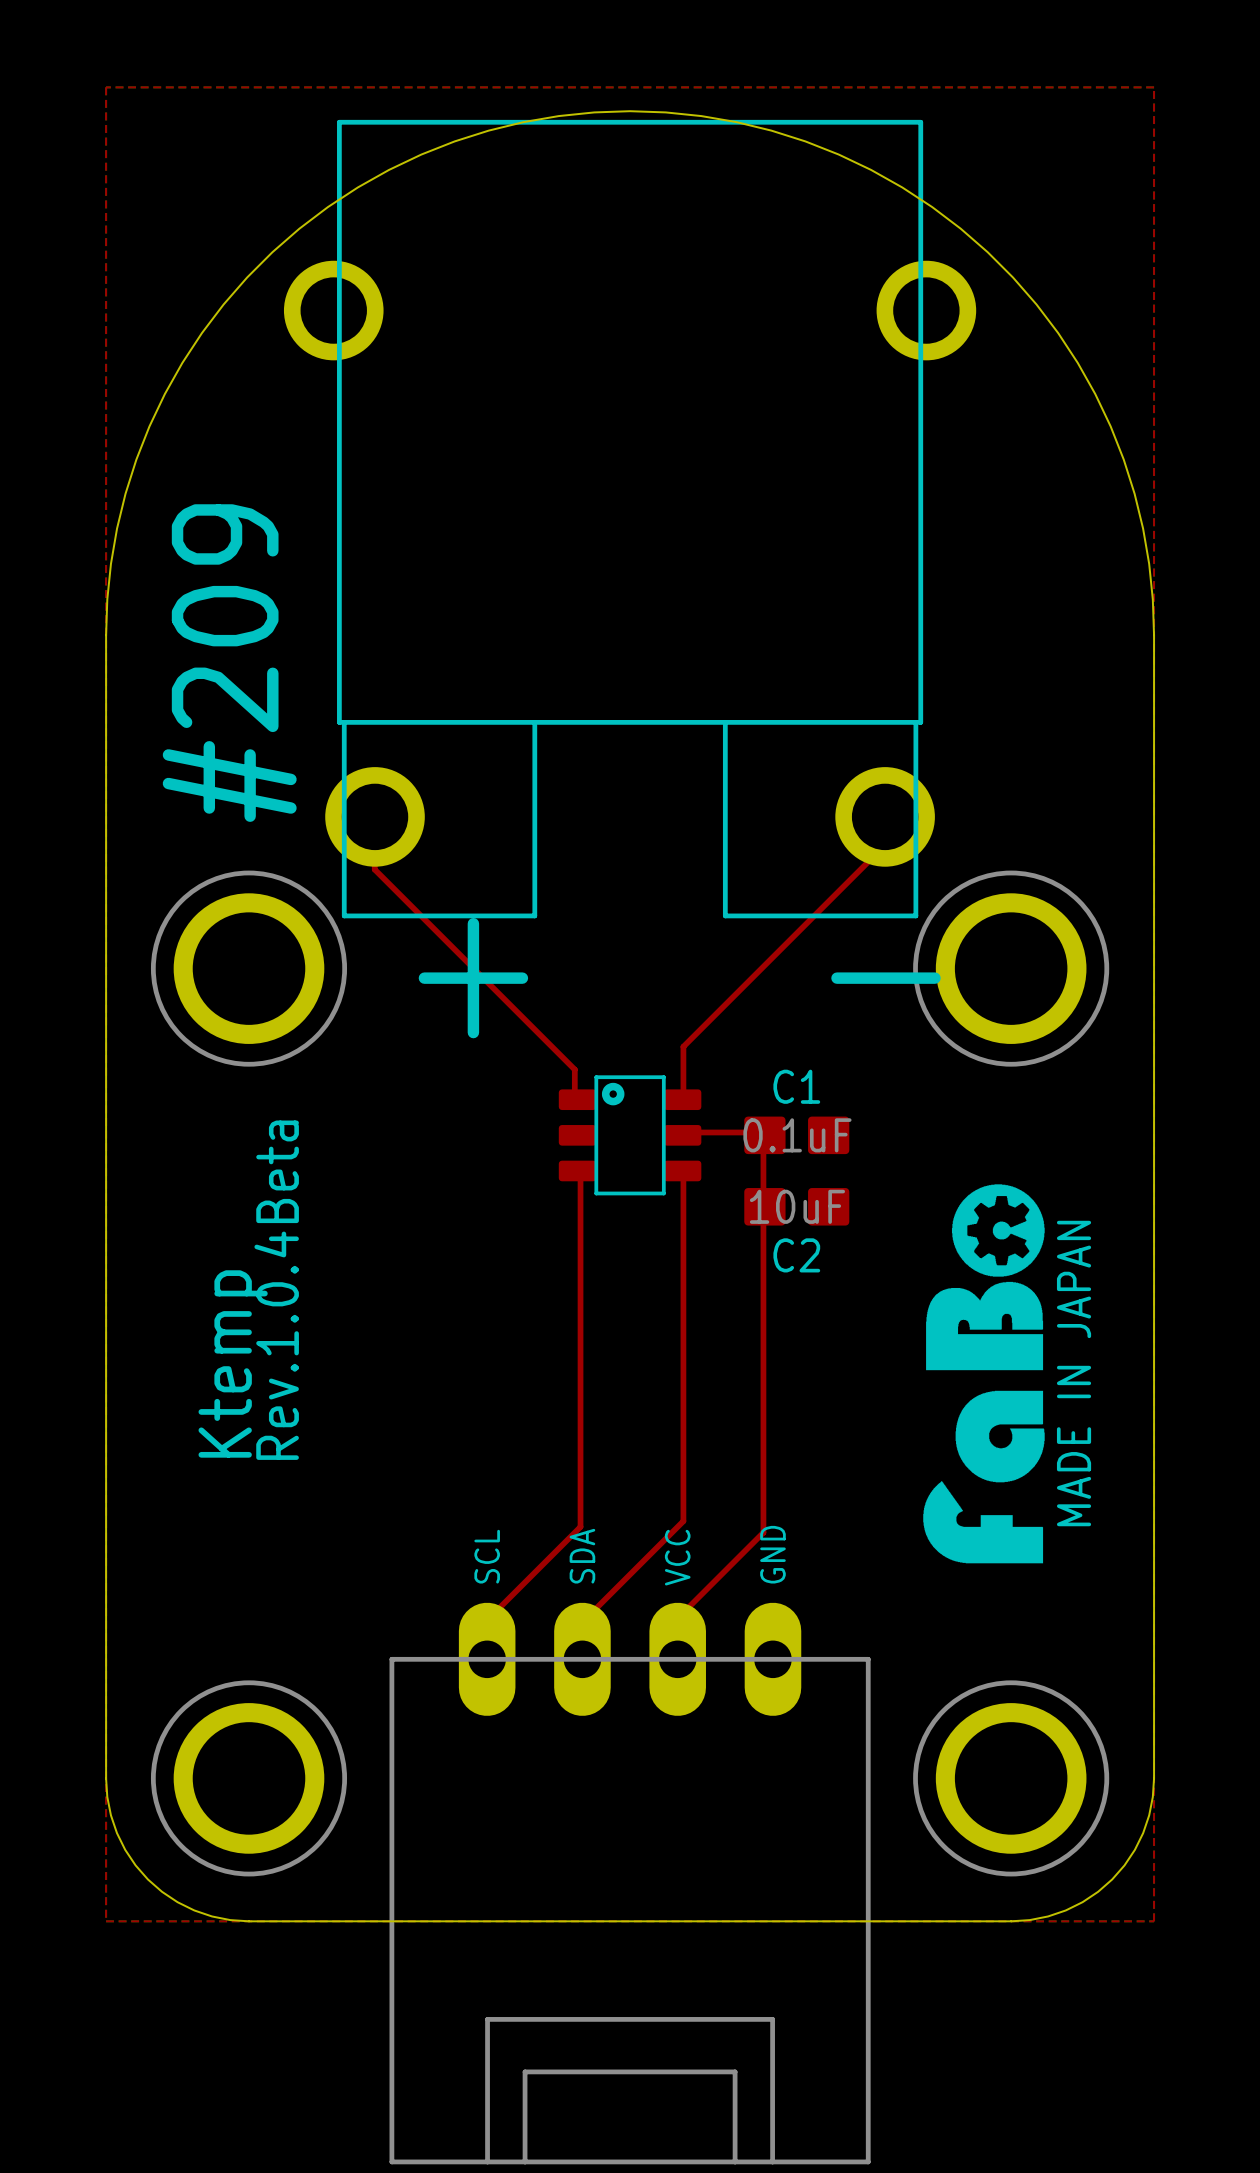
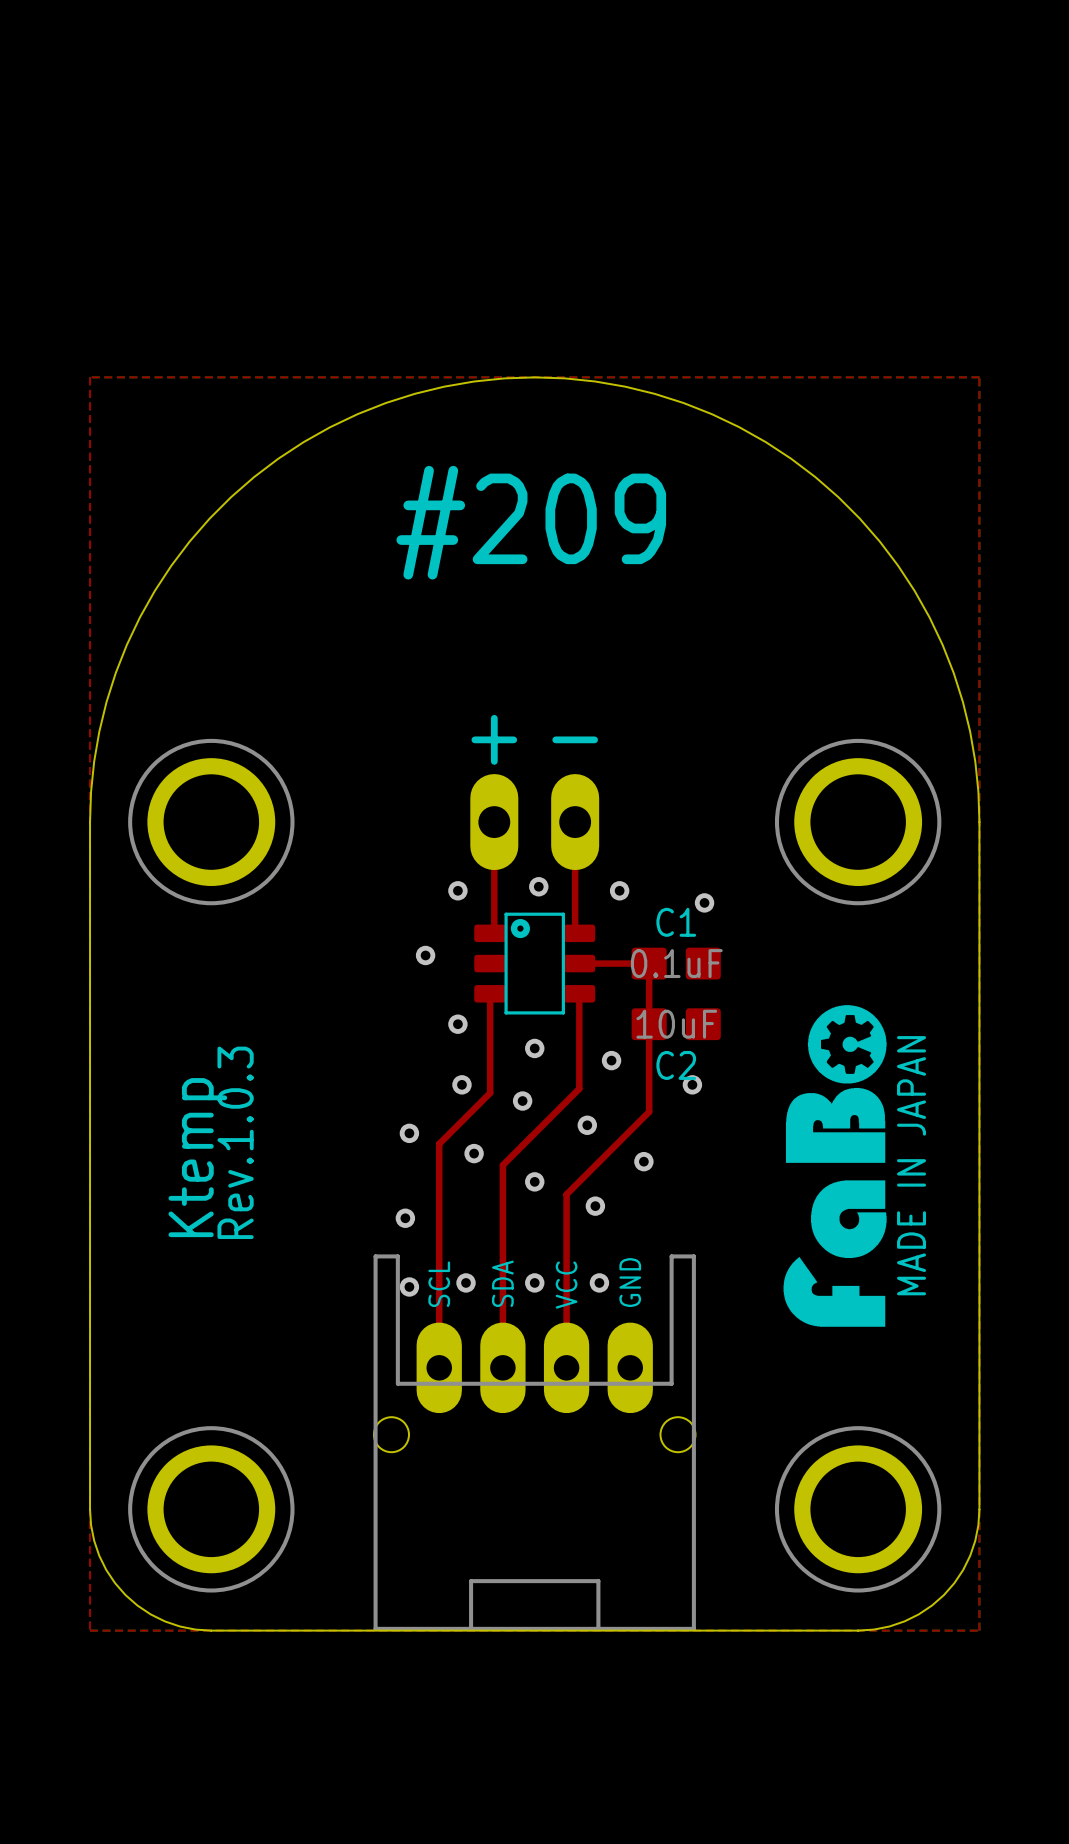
top zone outline: (106, 444) (106, 87) (1154, 87) (1154, 444) -> (90, 377) (979, 377)
part: (630, 519) -> none
text rotation: 0° (229, 663) -> 90° clockwise (531, 522)
text position: #209 (229, 663) -> #209 (531, 522)
top track: (375, 816) (374, 869) (574, 1069) (574, 1098) (577, 1099) -> (494, 822) (494, 929) (490, 933)
top track: (885, 816) (883, 818) (883, 846) (683, 1046) (682, 1099) -> (575, 822) (575, 929) (579, 933)
text: none -> + (494, 739)
text: none -> - (575, 739)
part: none -> (534, 822)
via: none -> (538, 886)
via: none -> (457, 890)
via: none -> (619, 890)
via: none -> (704, 902)
via: none -> (425, 955)
top track: (682, 1135) (683, 1132) (763, 1132) (764, 1135) (763, 1532) (677, 1618) (677, 1659) -> (579, 963) (649, 963) (649, 1111) (566, 1194) (566, 1367)
part: (630, 1137) -> none
top track: (577, 1170) (580, 1172) (580, 1526) (489, 1618) (489, 1658) (487, 1659) -> (490, 993) (490, 1093) (439, 1143) (439, 1367)
top track: (682, 1170) (683, 1521) (586, 1618) (586, 1658) (582, 1659) -> (579, 993) (579, 1088) (502, 1165) (502, 1367)
part: none -> (534, 1004)
via: none -> (457, 1024)
via: none -> (534, 1048)
via: none -> (611, 1060)
via: none -> (461, 1084)
via: none -> (692, 1084)
text: Rev.1.0.4Beta (276, 1290) -> Rev.1.0.3 (235, 1142)
via: none -> (522, 1101)
via: none -> (587, 1125)
via: none -> (409, 1133)
via: none -> (474, 1153)
via: none -> (643, 1161)
via: none -> (534, 1181)
via: none -> (595, 1206)
via: none -> (405, 1218)
via: none -> (466, 1282)
via: none -> (534, 1282)
via: none -> (599, 1282)
via: none -> (409, 1286)

